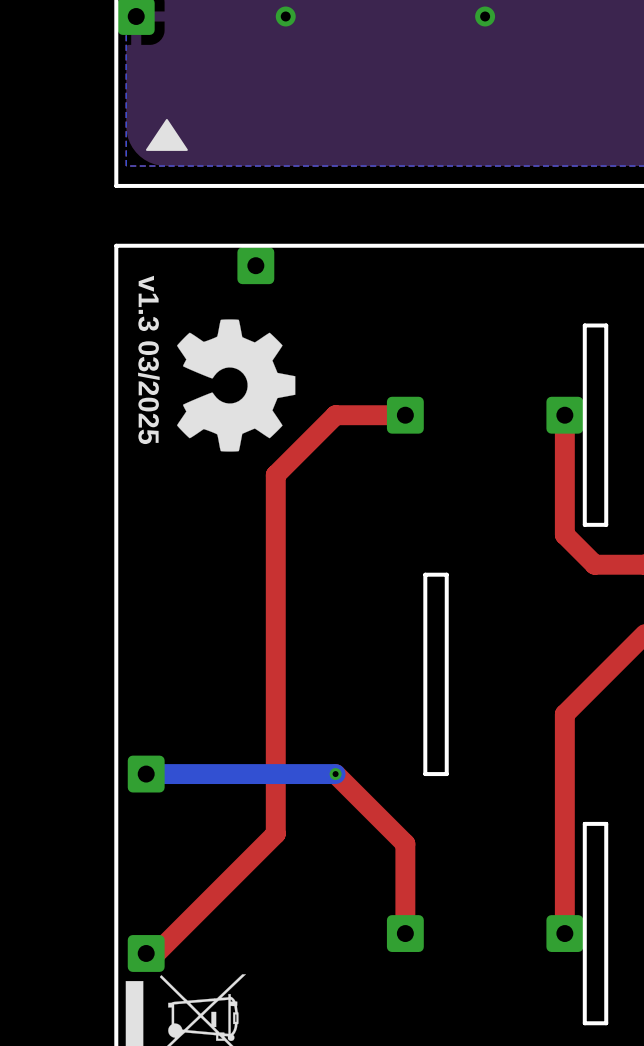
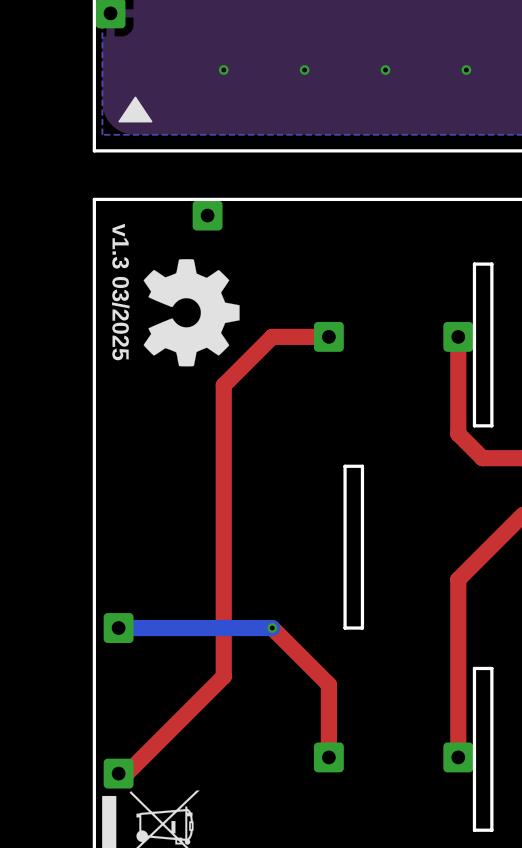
via: (285, 16) -> none
via: (485, 16) -> none
via: none -> (223, 69)
via: none -> (304, 69)
via: none -> (385, 69)
via: none -> (466, 69)

